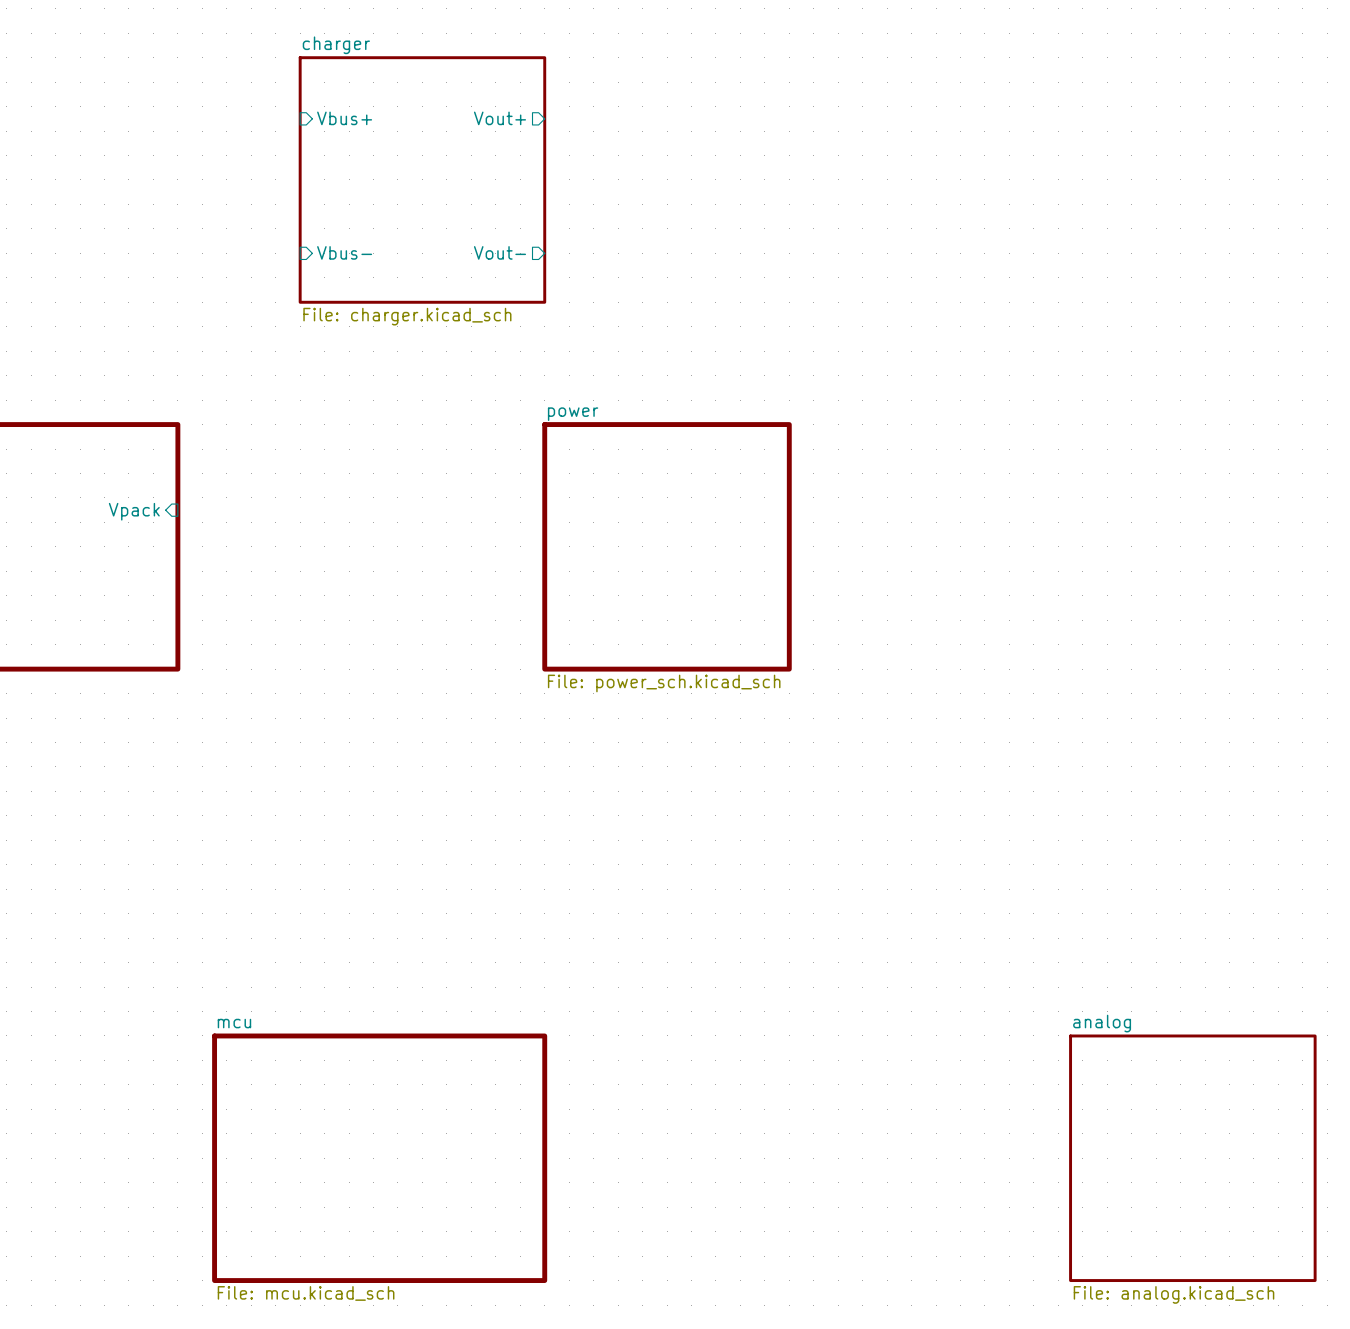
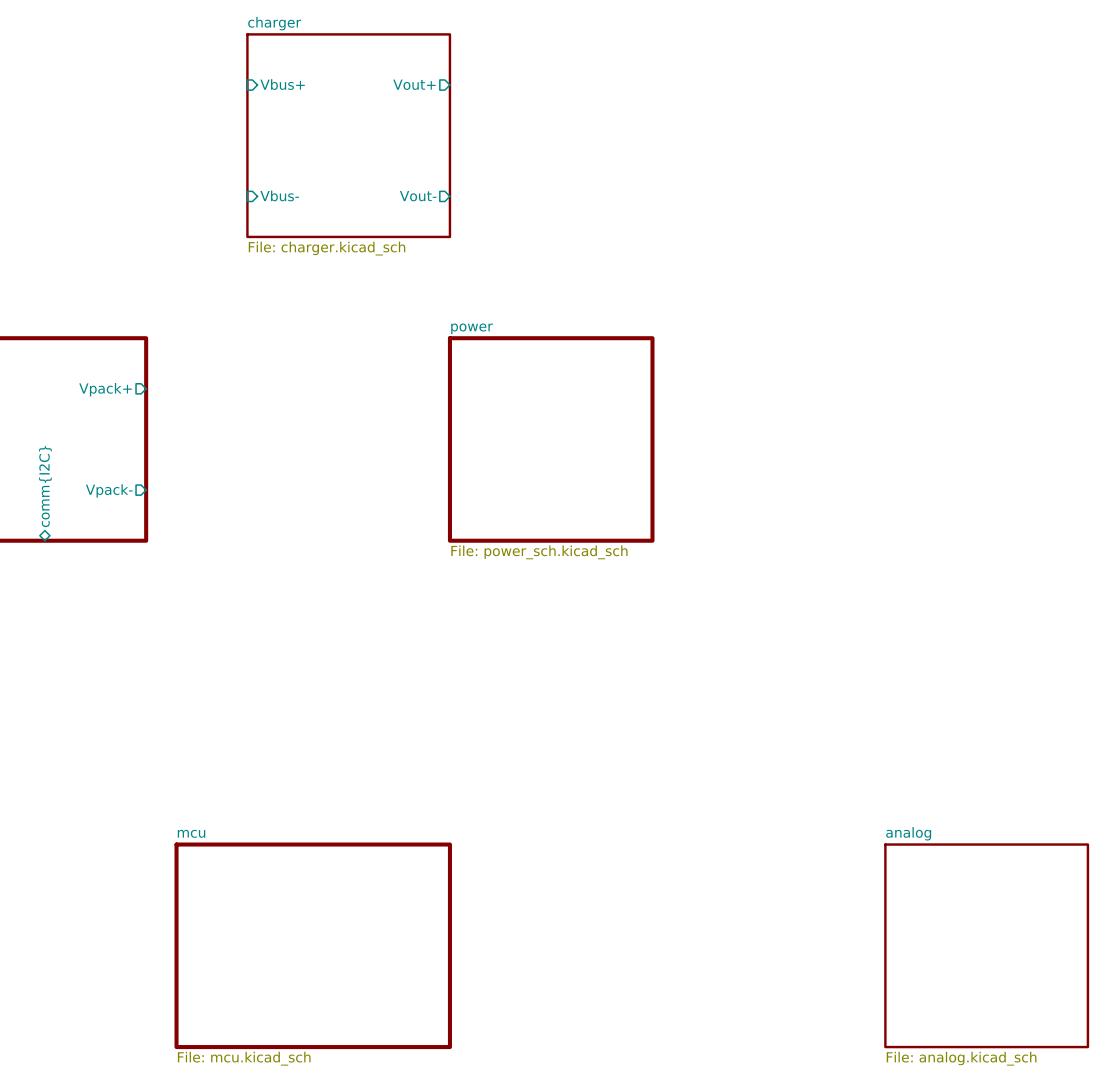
sheet pin shape: input (134, 511) -> output (105, 389)
sheet pin: Vpack (134, 511) -> Vpack+ (105, 389)
sheet pin: none -> comm{I2C} (45, 486)
sheet pin: none -> Vpack- (109, 490)

